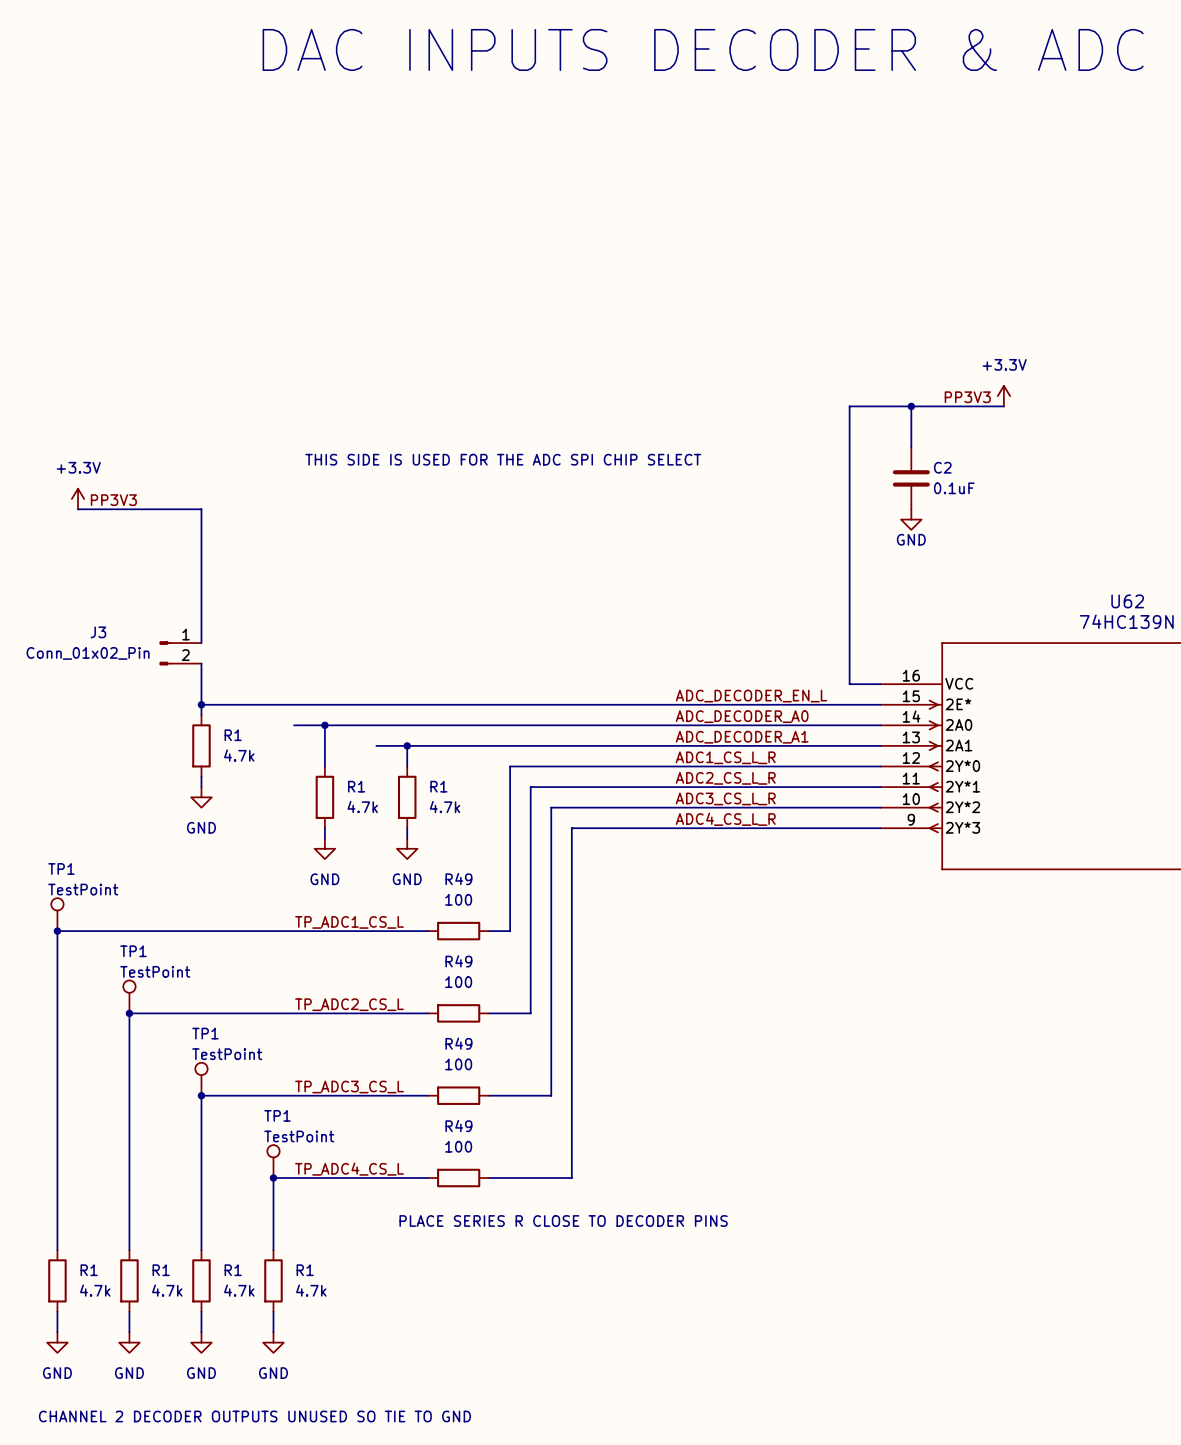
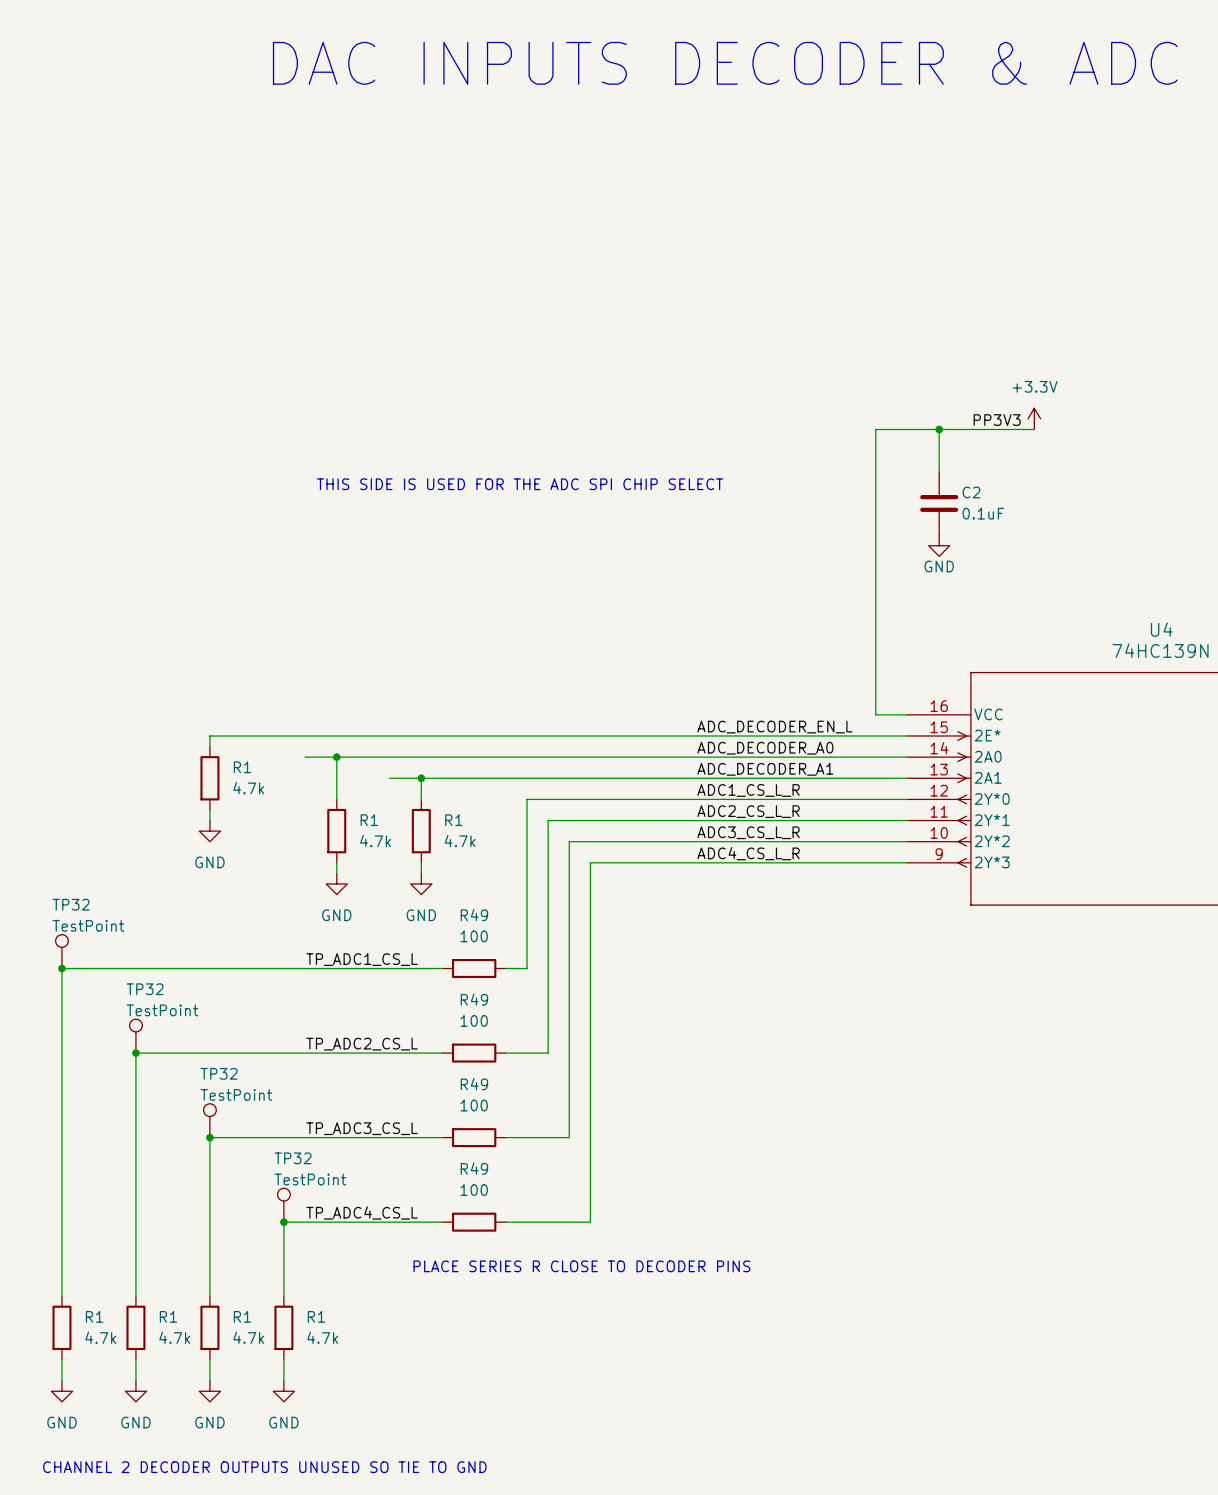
power symbol: +3.3V (78, 499) -> none
label: PP3V3 (113, 500) -> none
wire: (78, 509) (201, 509) (201, 643) -> none
U62 name: U62 (1127, 601) -> U4 (1161, 629)
J3: Conn_01x02_Pin (180, 653) -> none
wire: (201, 663) (201, 704) -> none
junction: (201, 704) -> none
TP1 name: TP1 (61, 868) -> TP32 (71, 904)
TP1 name: TP1 (133, 951) -> TP32 (145, 989)
TP1 name: TP1 (205, 1033) -> TP32 (219, 1073)
TP1 name: TP1 (277, 1115) -> TP32 (293, 1158)

